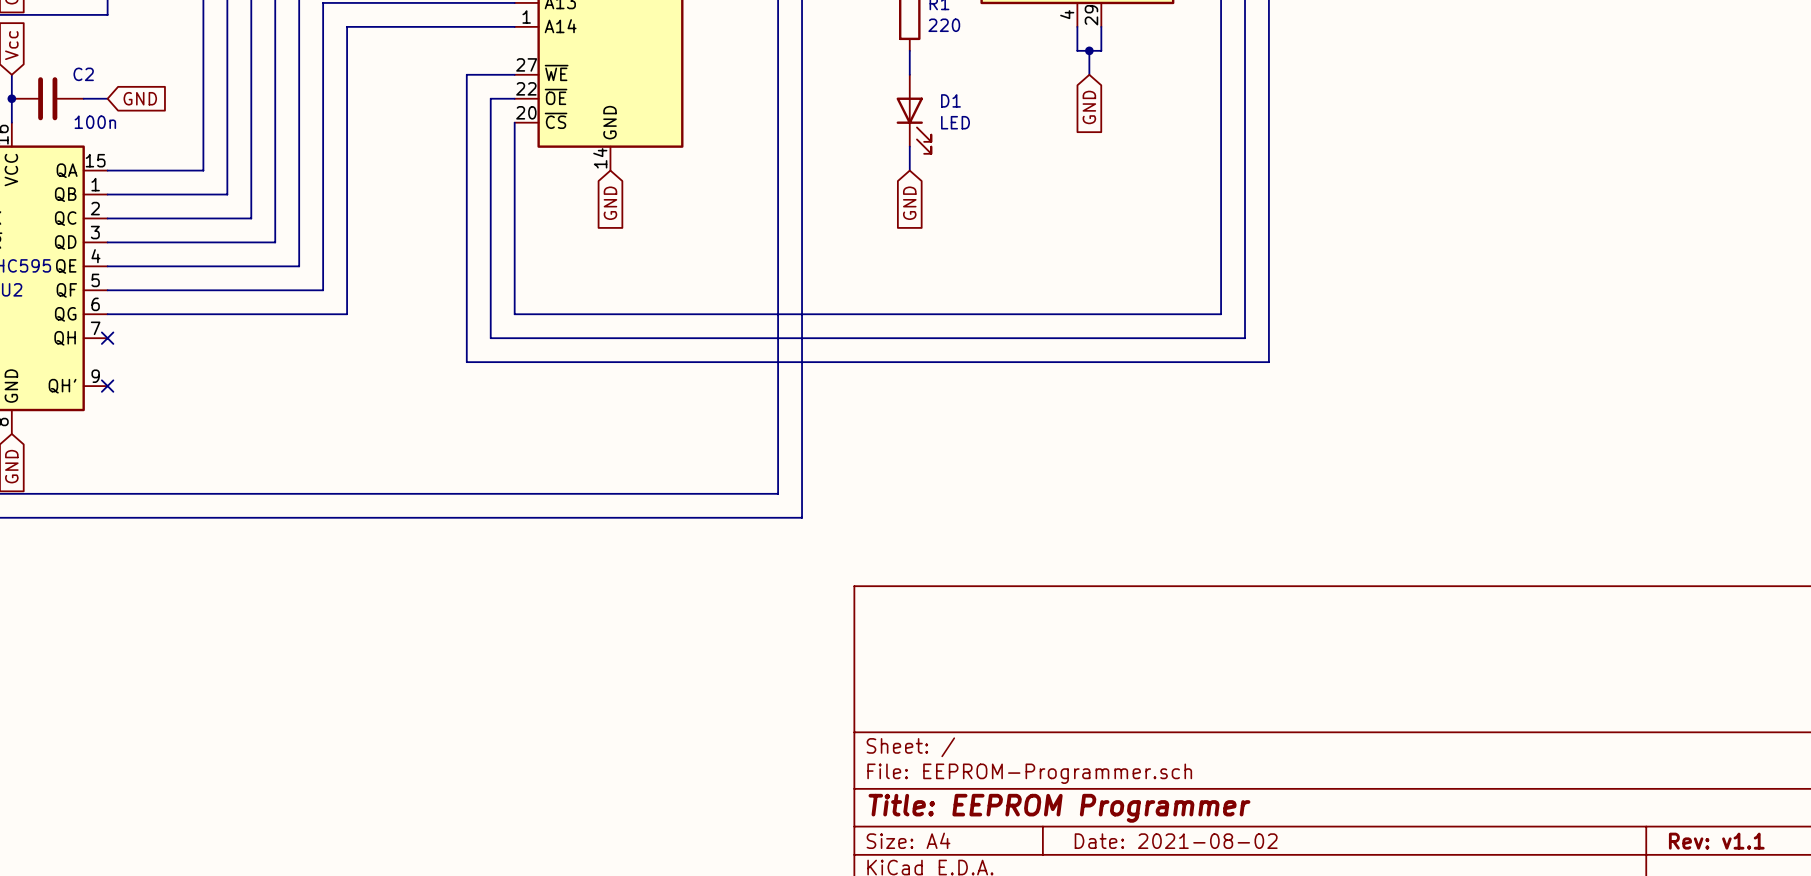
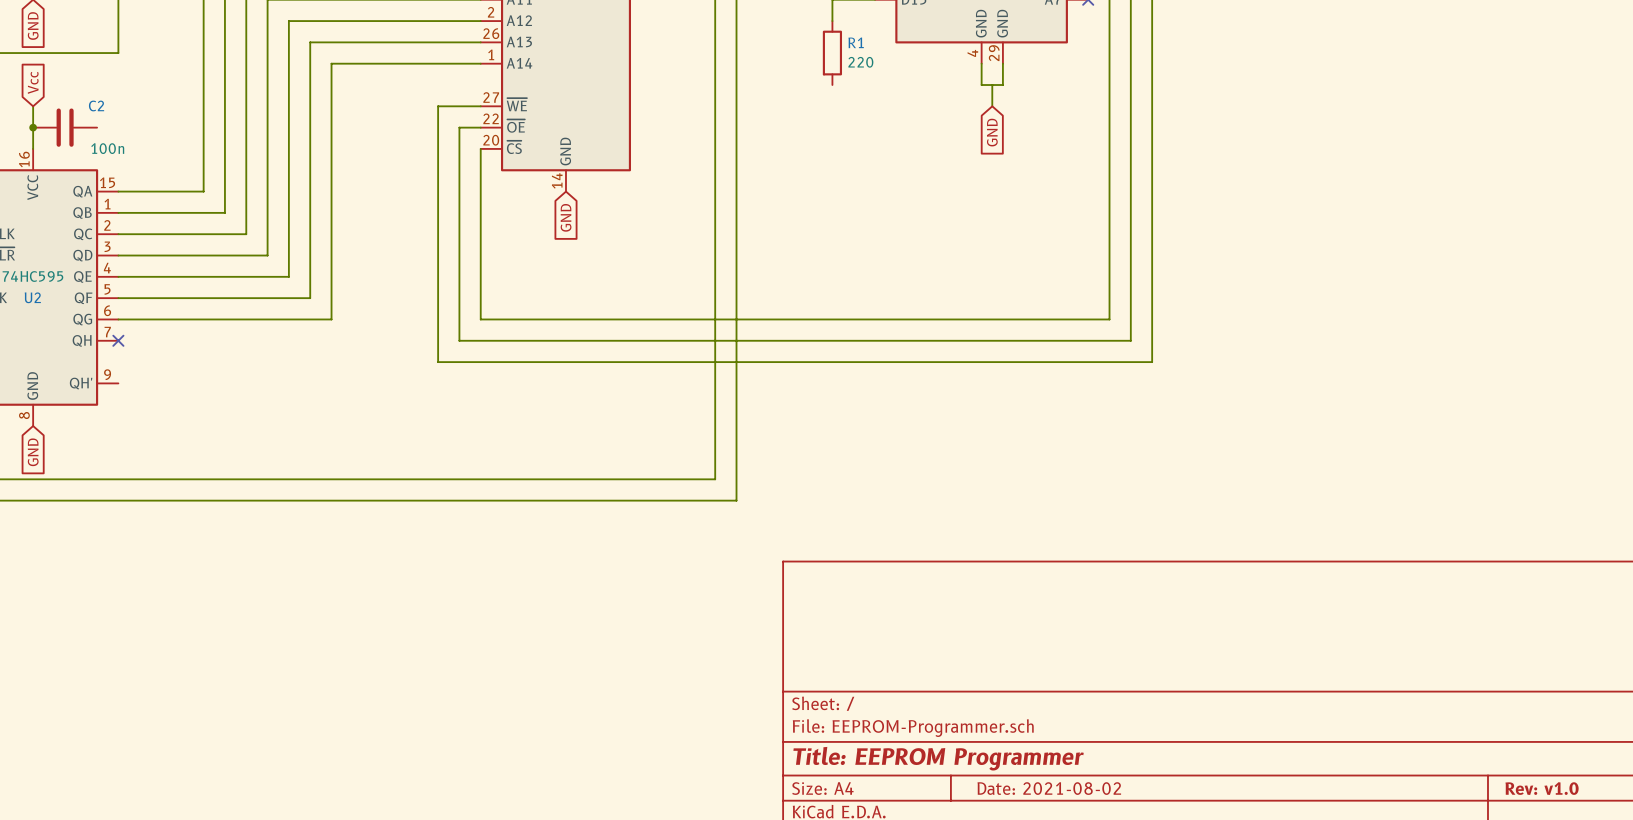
wire: (909, 50) (909, 74) -> none
junction: (1089, 50) -> none
wire: (83, 98) (107, 98) -> none
global label: GND (140, 98) -> none
D1: LED (913, 114) -> none
wire: (909, 146) (909, 170) -> none
global label: GND (909, 203) -> none
no-connect mark: (107, 386) -> none
title block: Rev: v1.1 (1716, 841) -> Rev: v1.0 (1542, 788)

